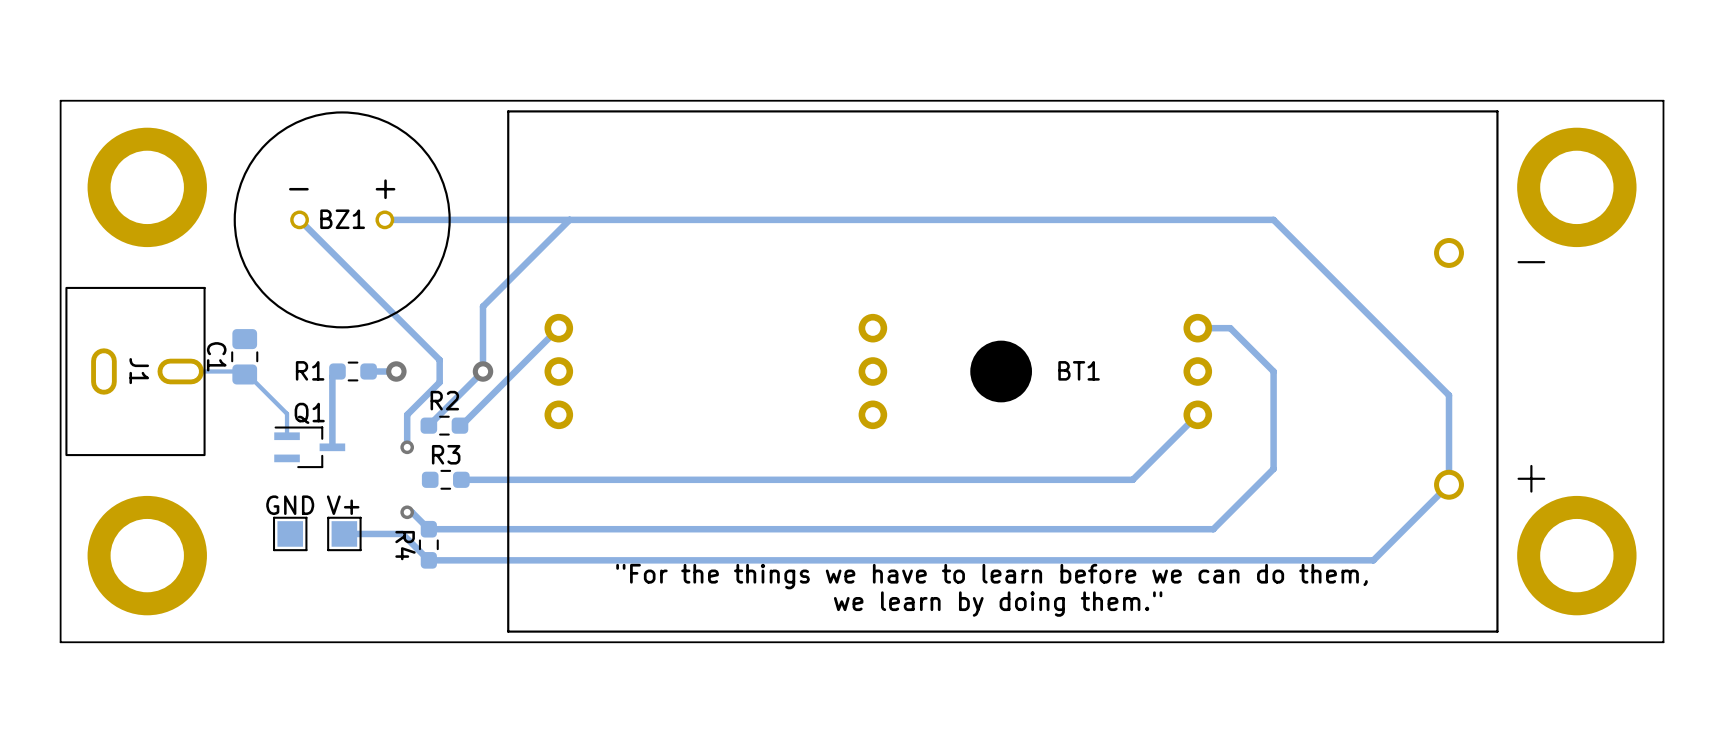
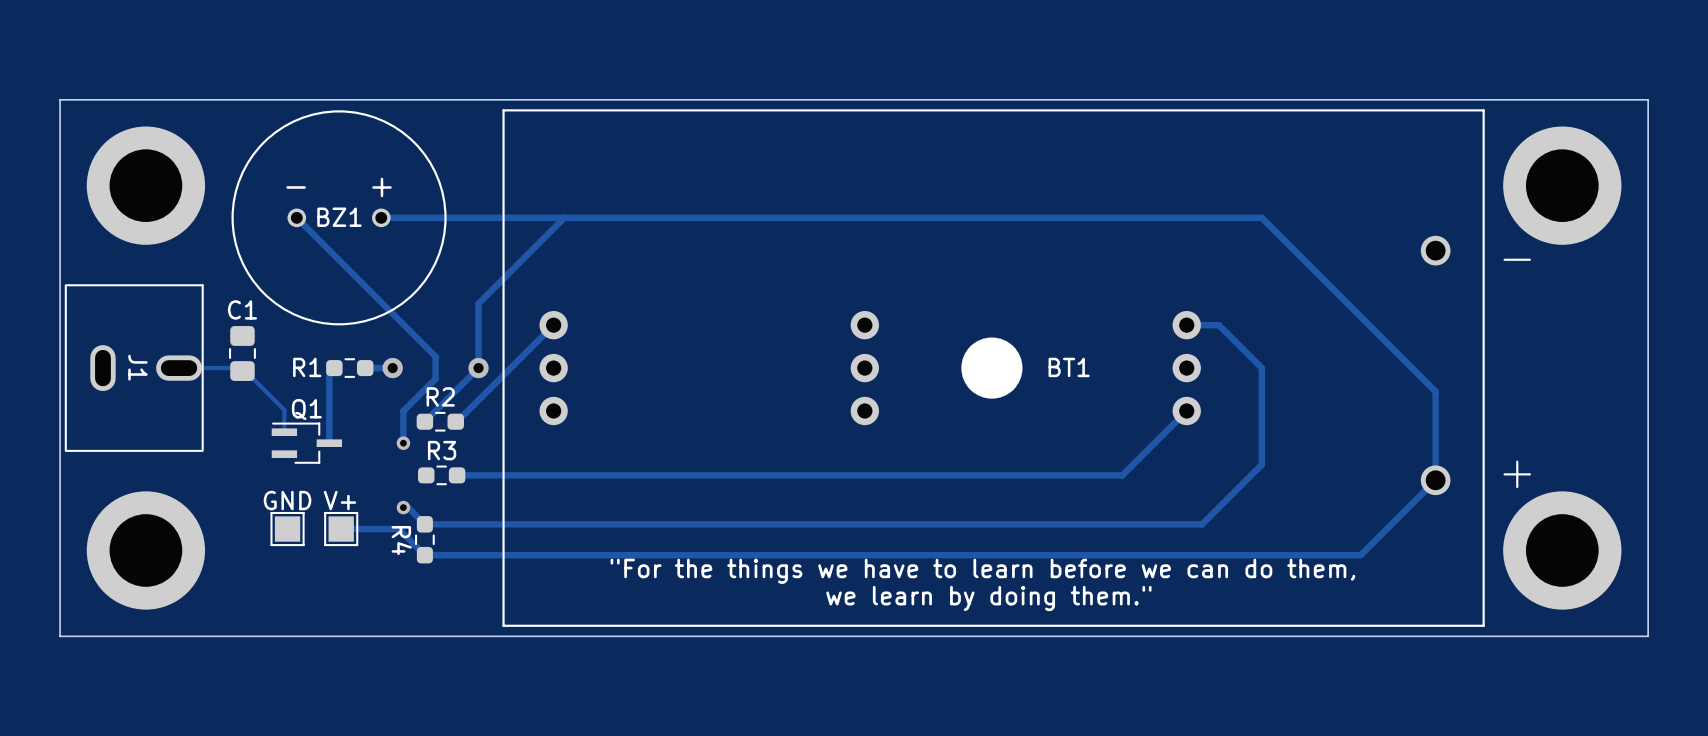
C1 name rotation: 0° (216, 356) -> 90° counterclockwise (242, 309)
C1 name position: C1 (216, 356) -> C1 (242, 309)

